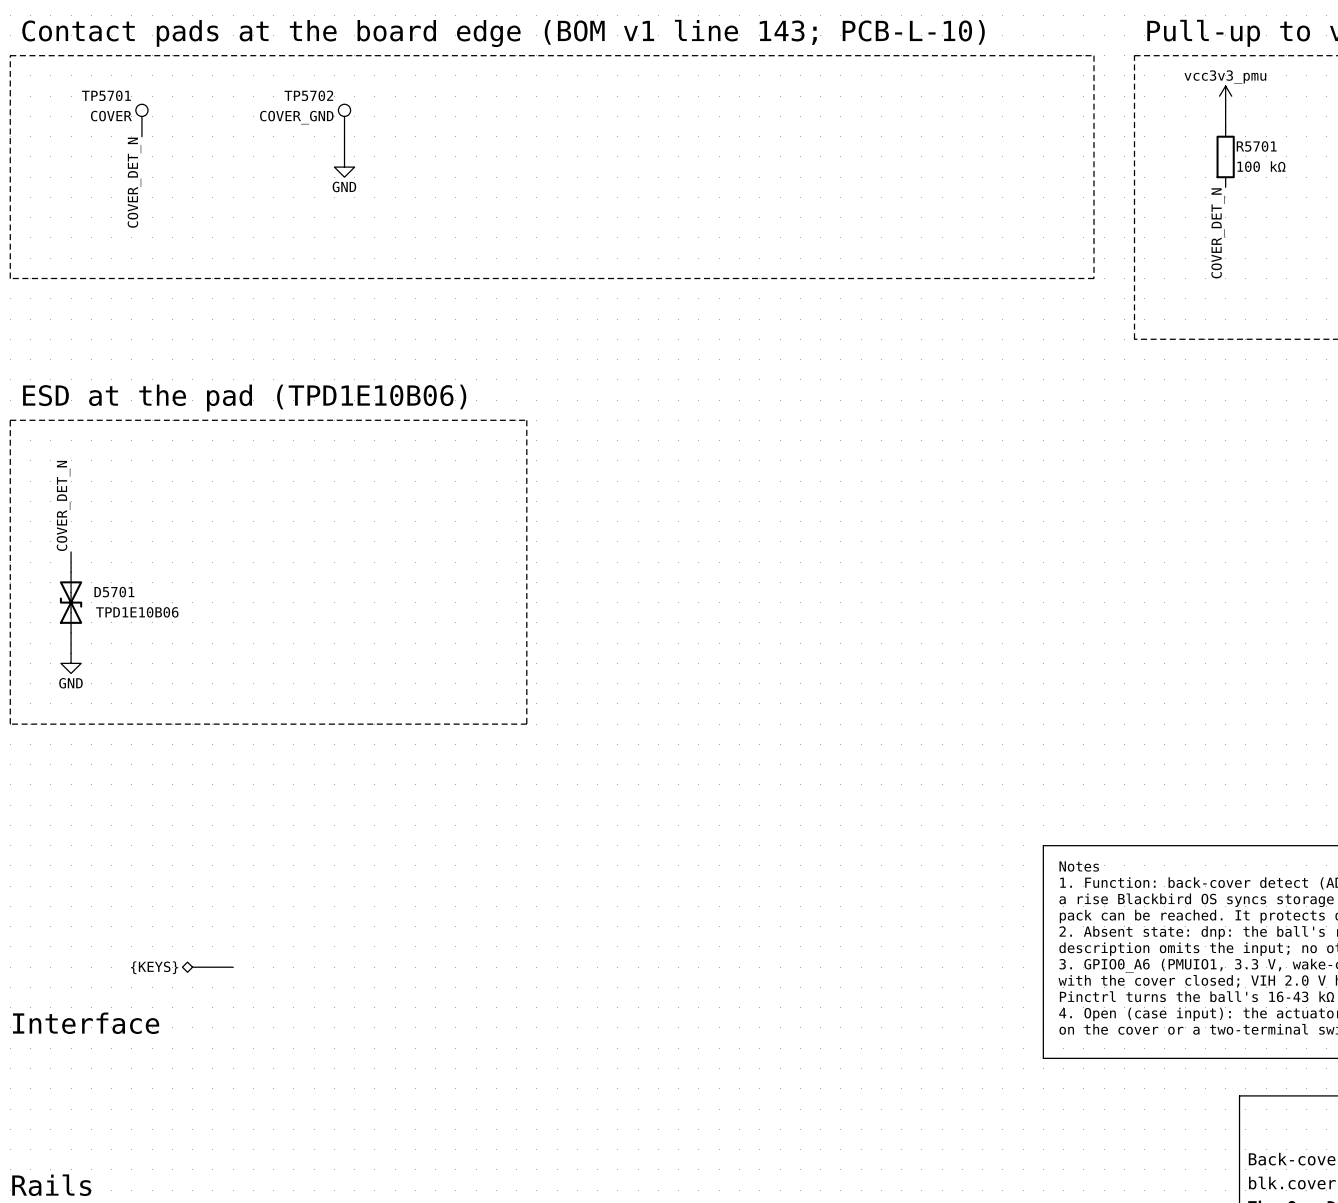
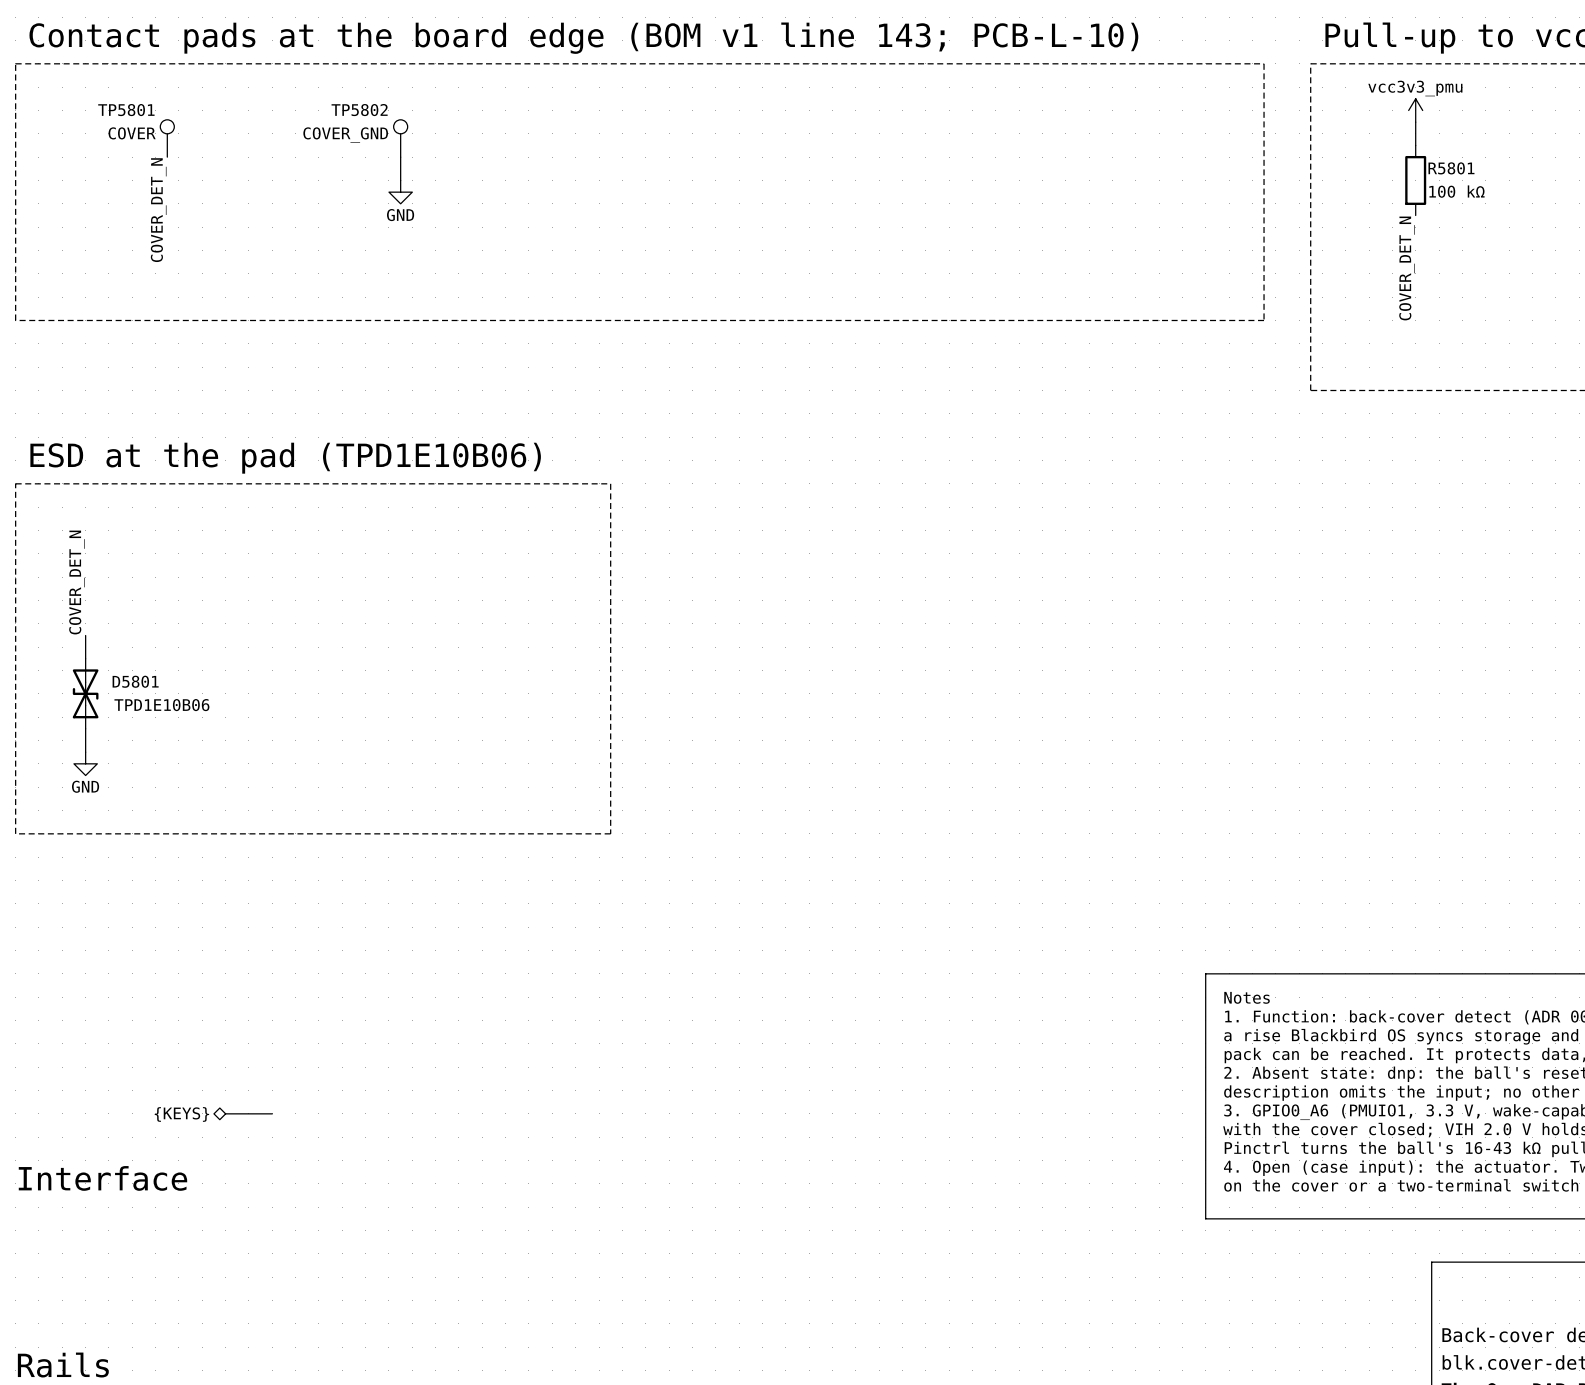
TP5701 name: TP5701 (106, 95) -> TP5801 (126, 110)
TP5702 name: TP5702 (308, 95) -> TP5802 (359, 110)
R5701 name: R5701 (1256, 146) -> R5801 (1451, 168)
D5701 name: D5701 (114, 592) -> D5801 (135, 681)

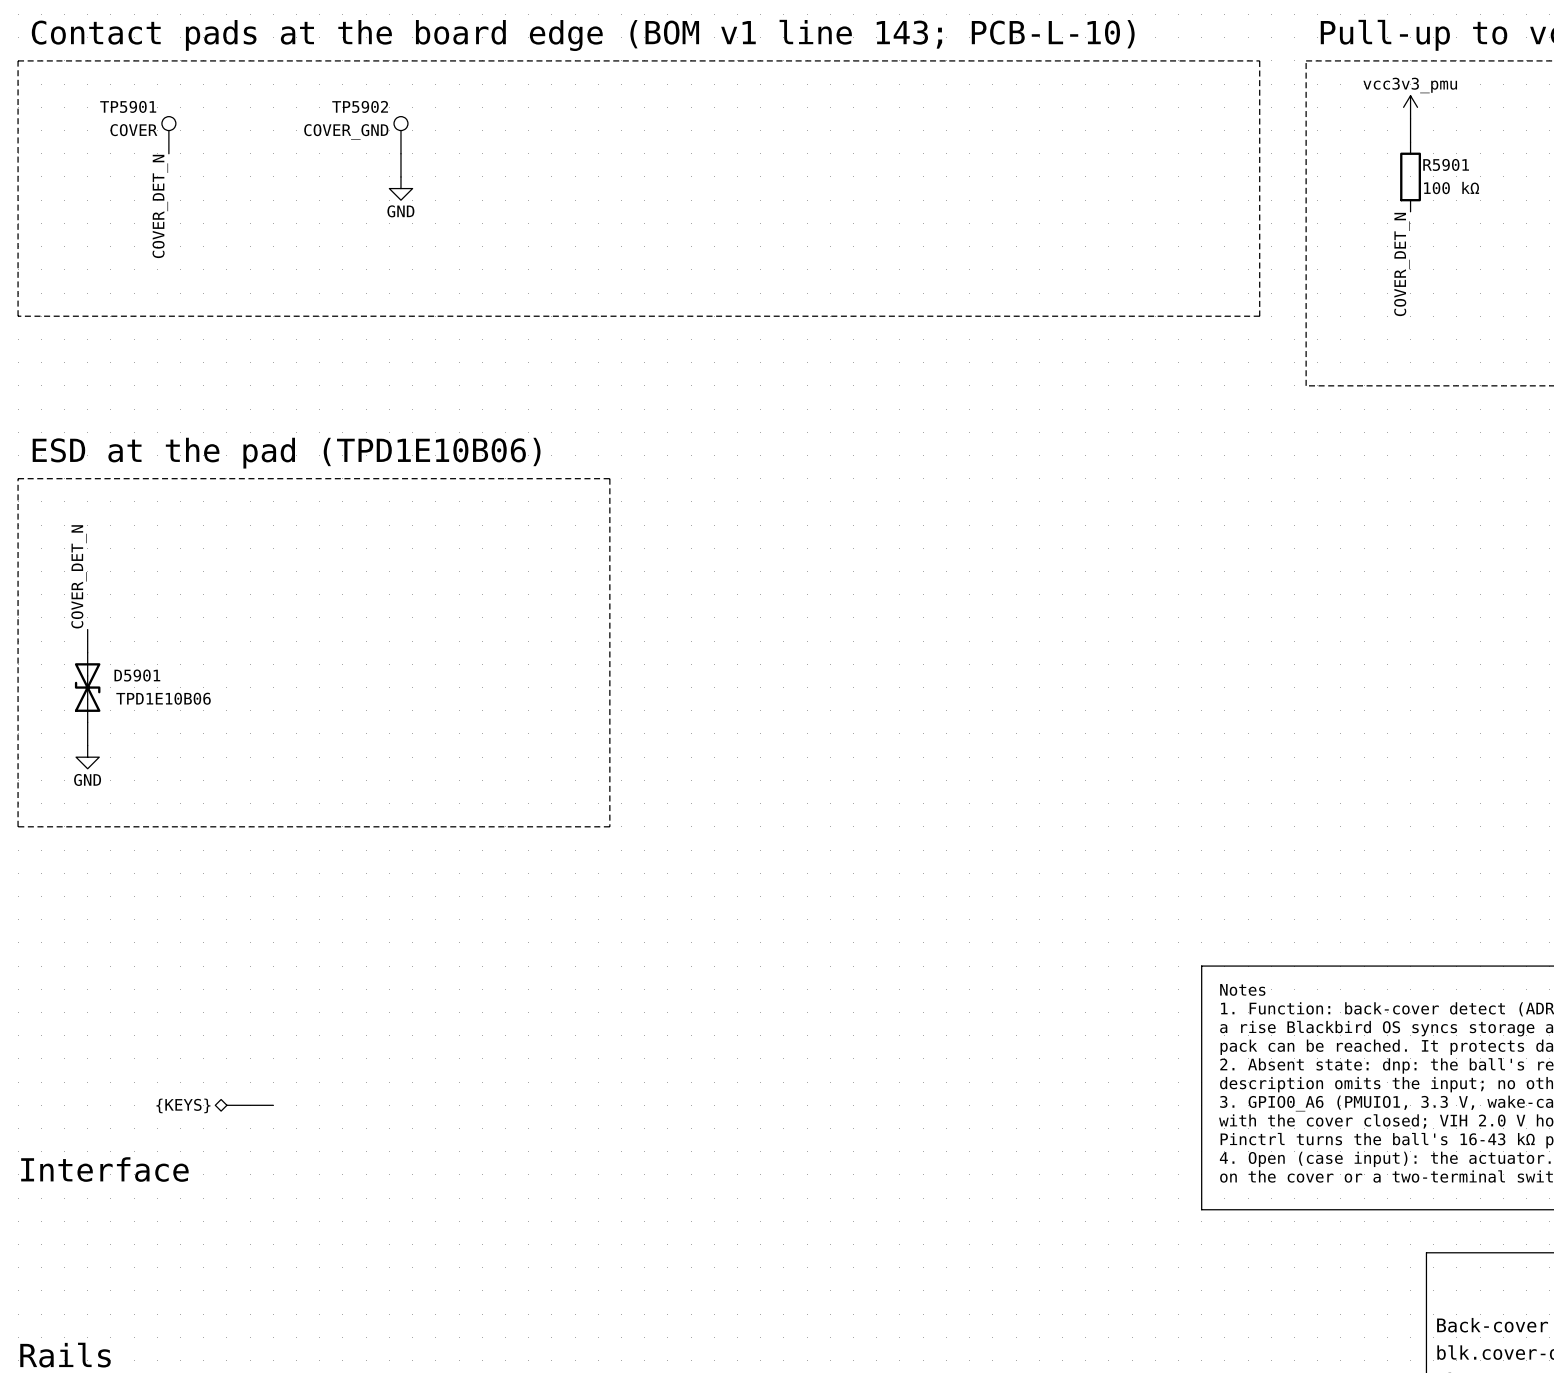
TP5801 name: TP5801 (126, 110) -> TP5901 (128, 106)
TP5802 name: TP5802 (359, 110) -> TP5902 (360, 106)
R5801 name: R5801 (1451, 168) -> R5901 (1446, 164)
D5801 name: D5801 (135, 681) -> D5901 (137, 675)

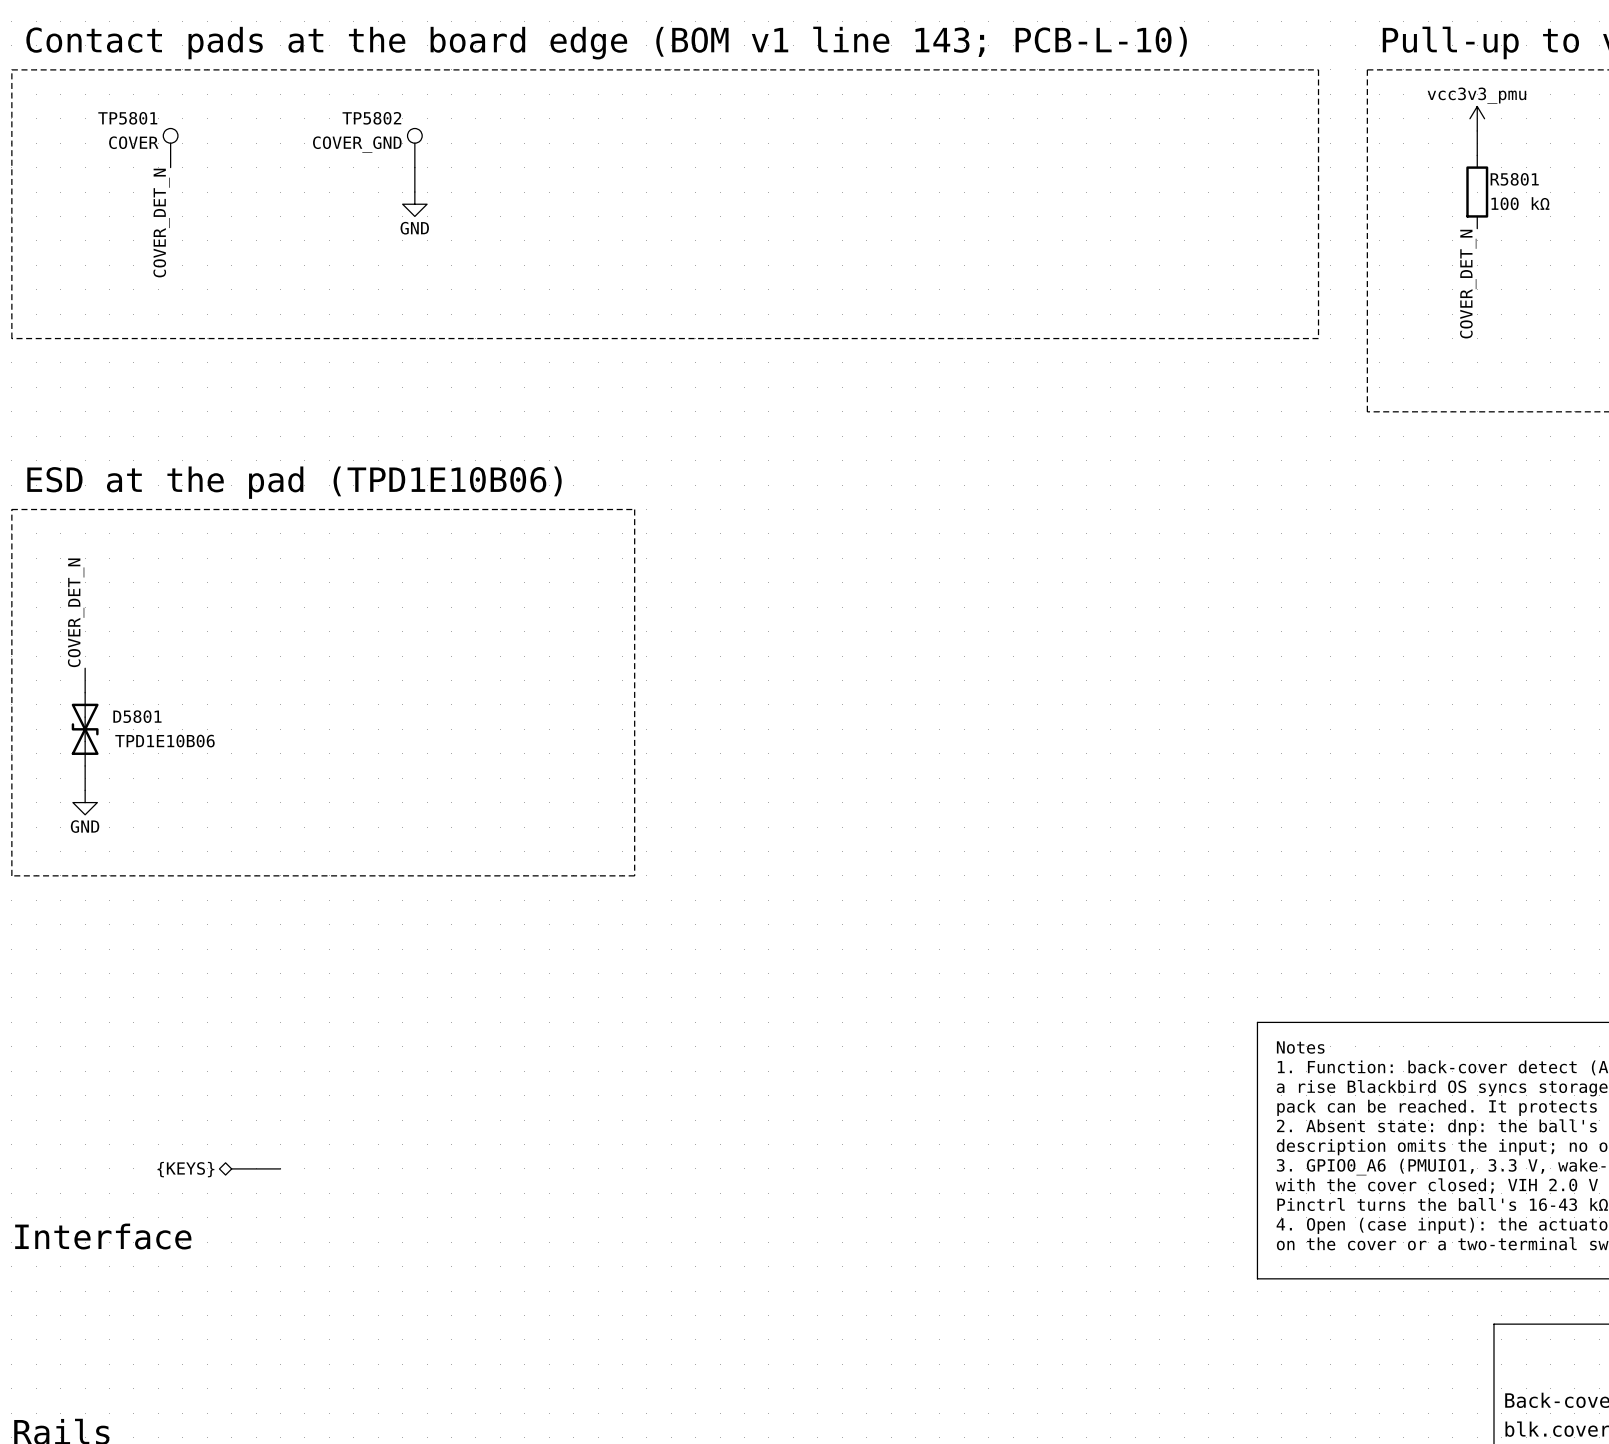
TP5901 name: TP5901 (128, 106) -> TP5801 (127, 118)
TP5902 name: TP5902 (360, 106) -> TP5802 (371, 118)
R5901 name: R5901 (1446, 164) -> R5801 (1514, 179)
D5901 name: D5901 (137, 675) -> D5801 (137, 716)

